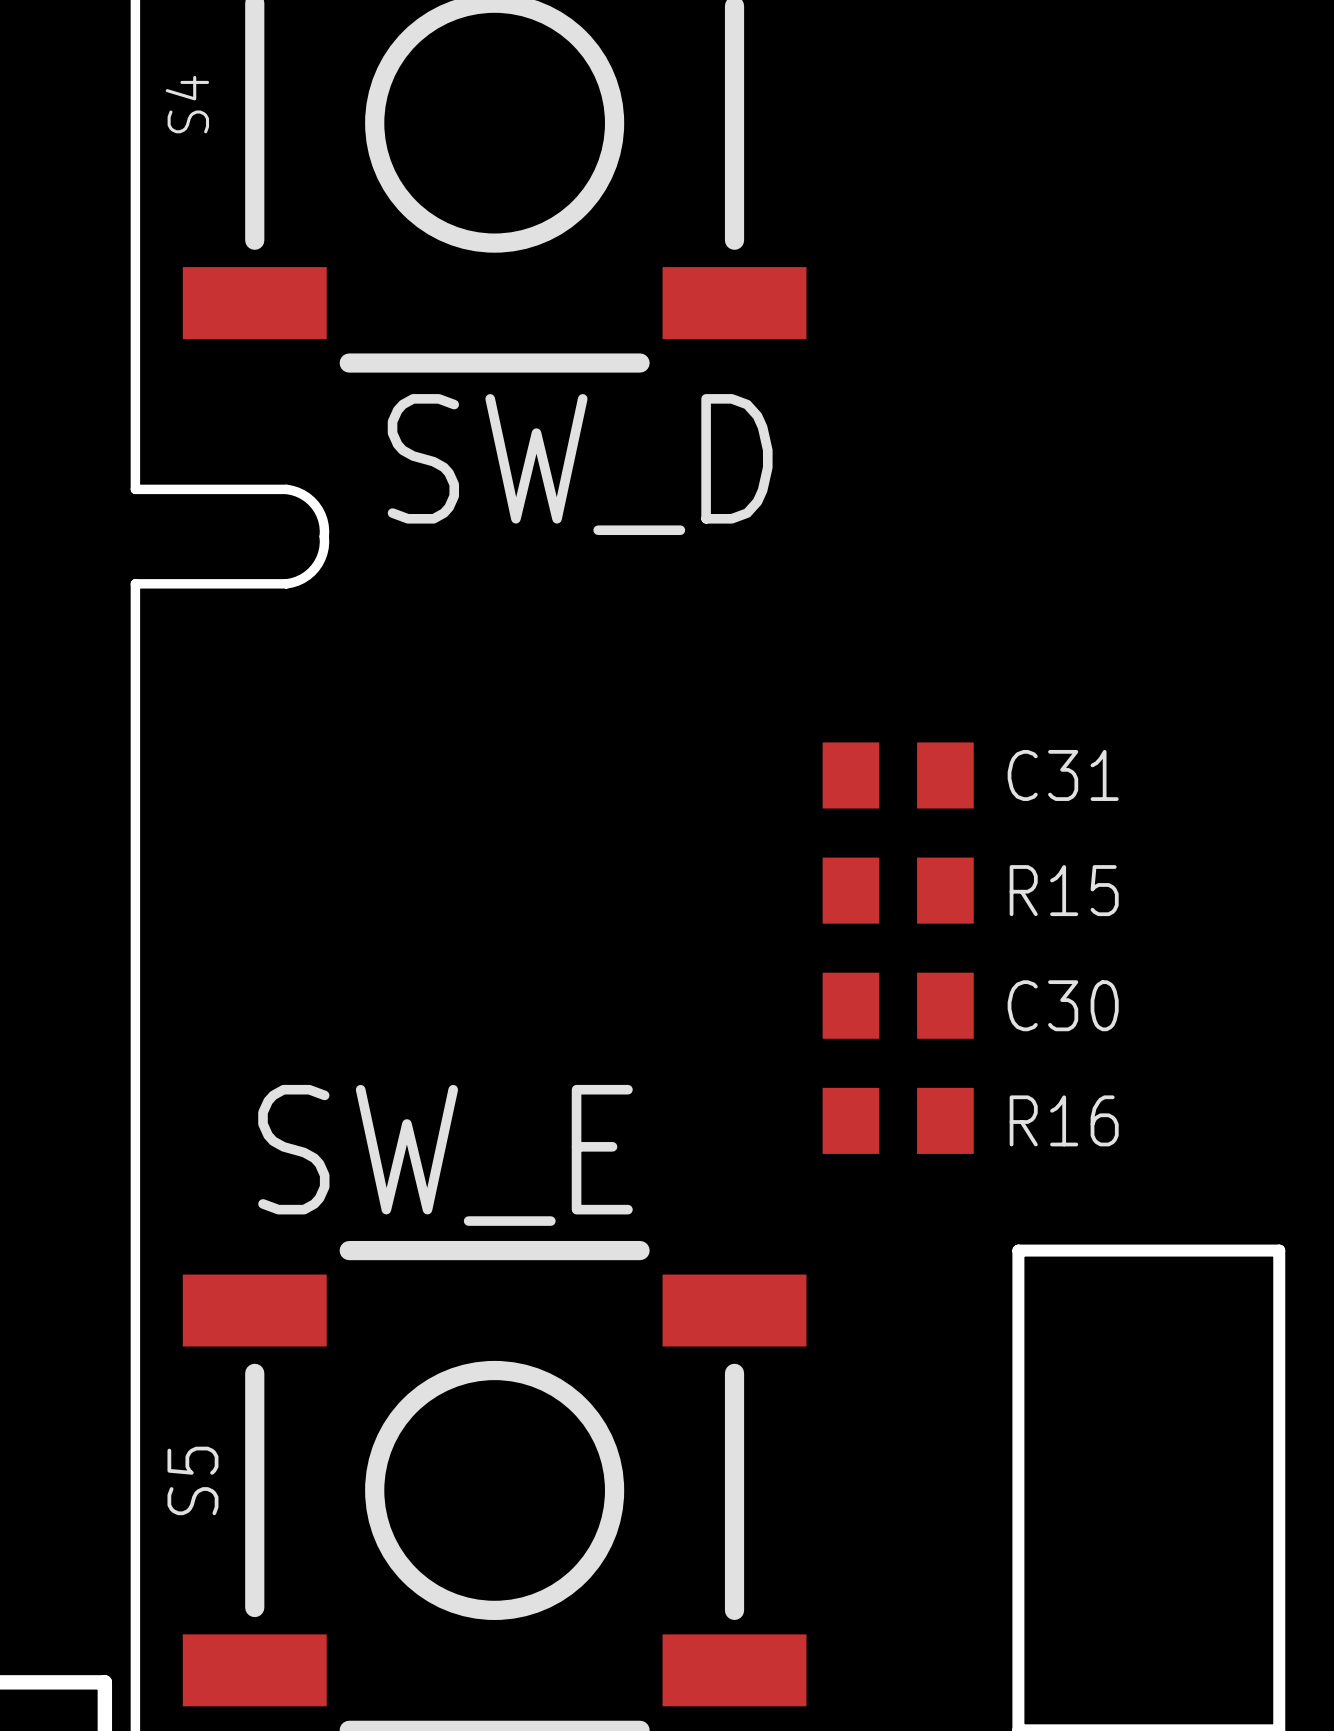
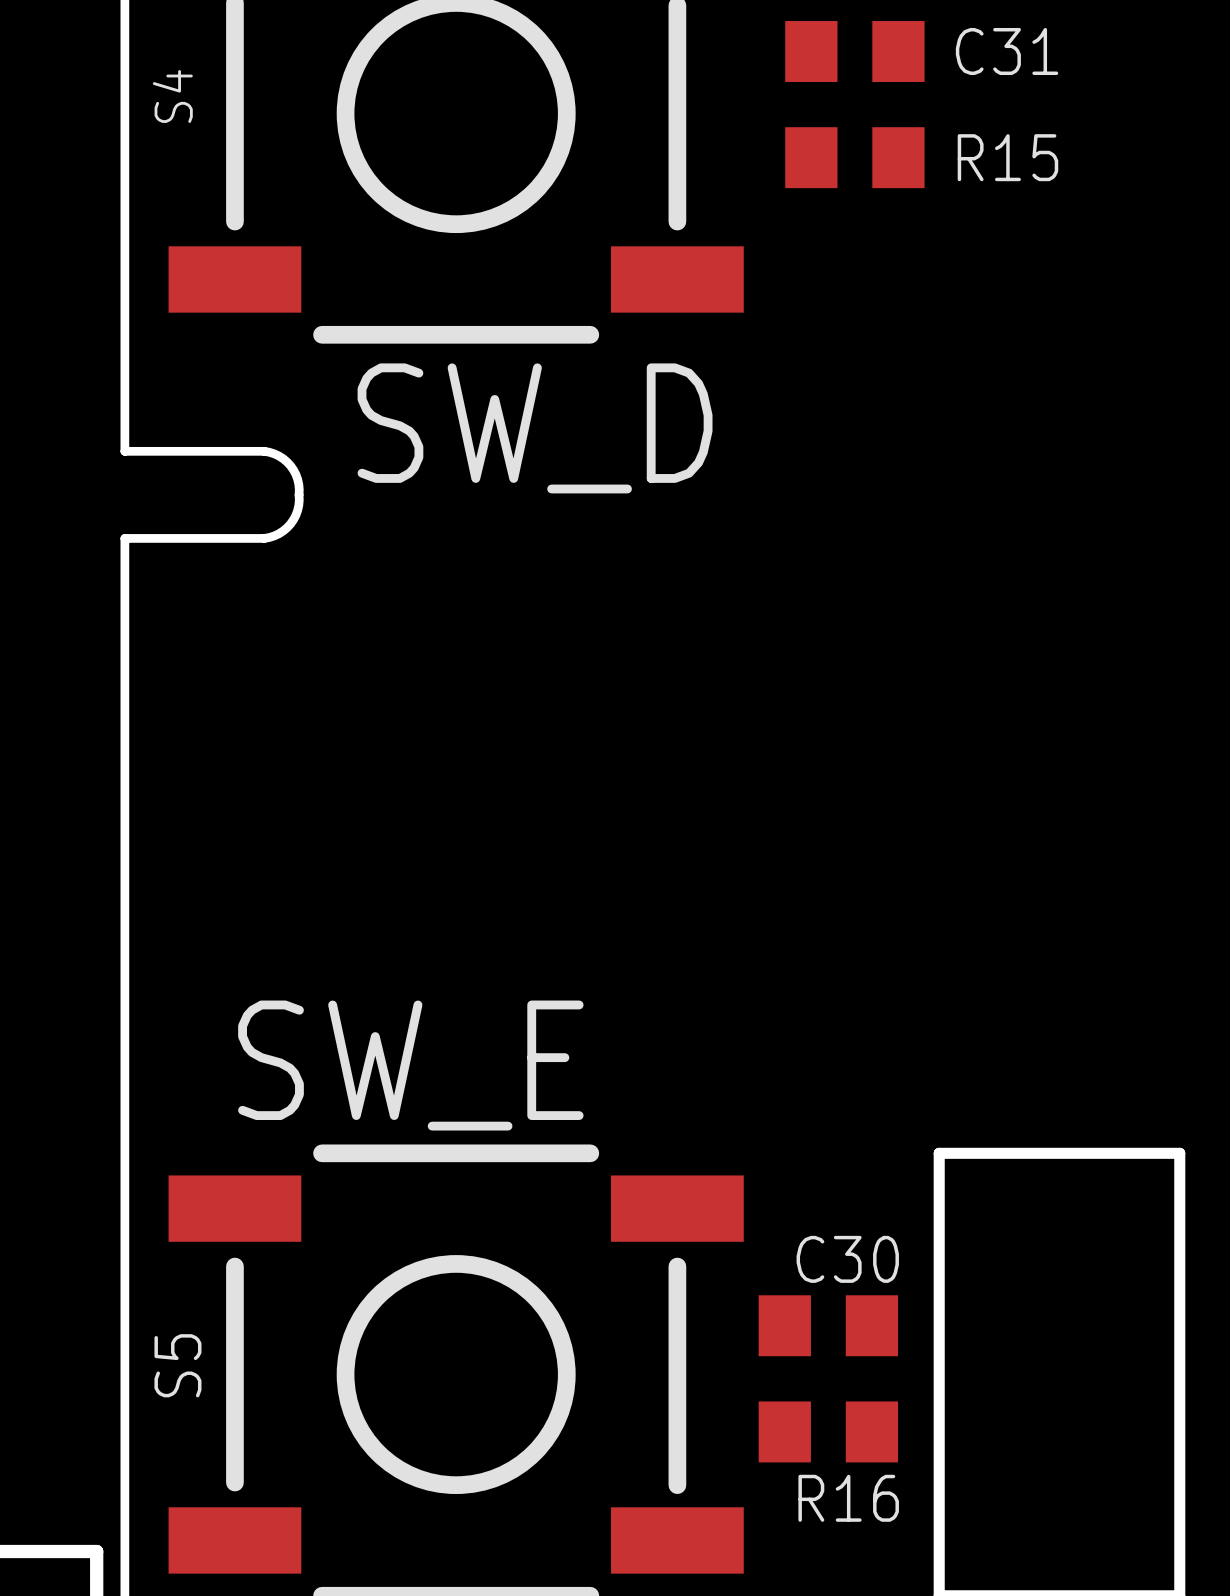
C31 position: (898, 775) -> (854, 51)
R15 position: (898, 890) -> (854, 157)
C30 position: (898, 1005) -> (828, 1325)
C30 name position: C30 (1063, 1005) -> C30 (847, 1259)
R16 position: (898, 1120) -> (828, 1431)
R16 name position: R16 (1064, 1120) -> R16 (848, 1498)

